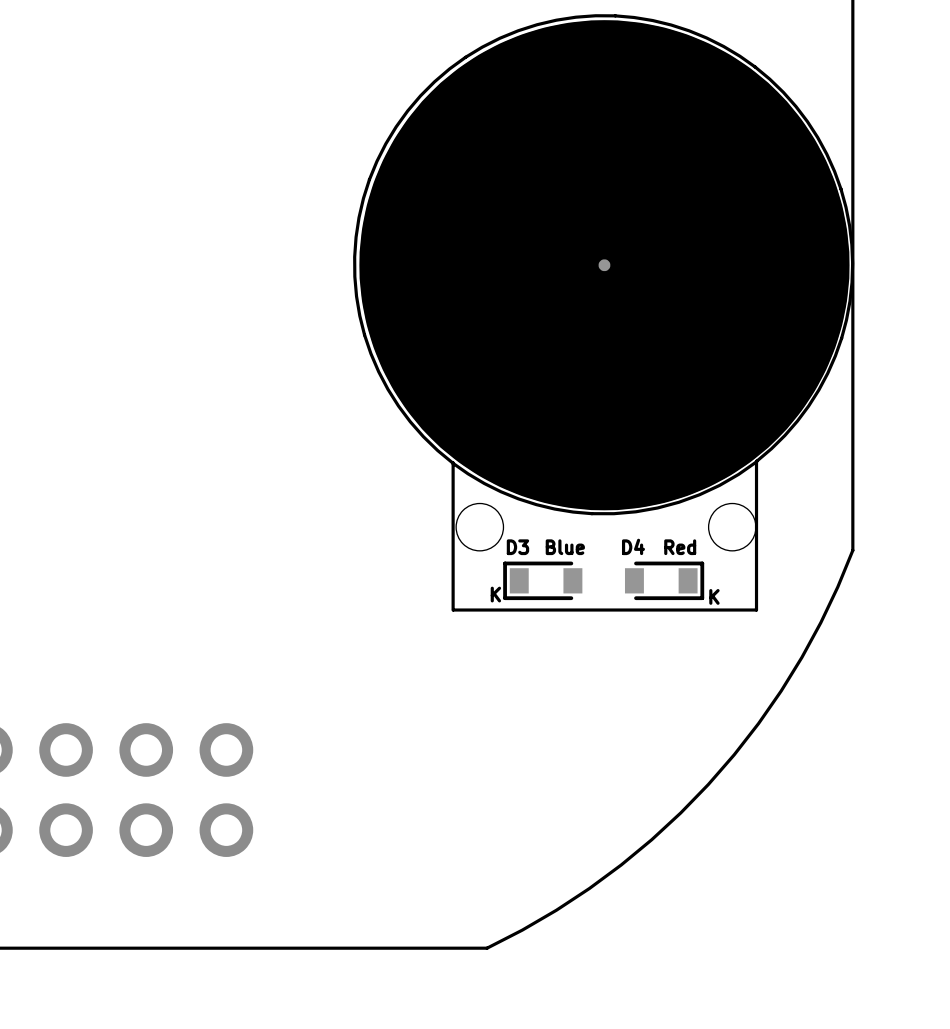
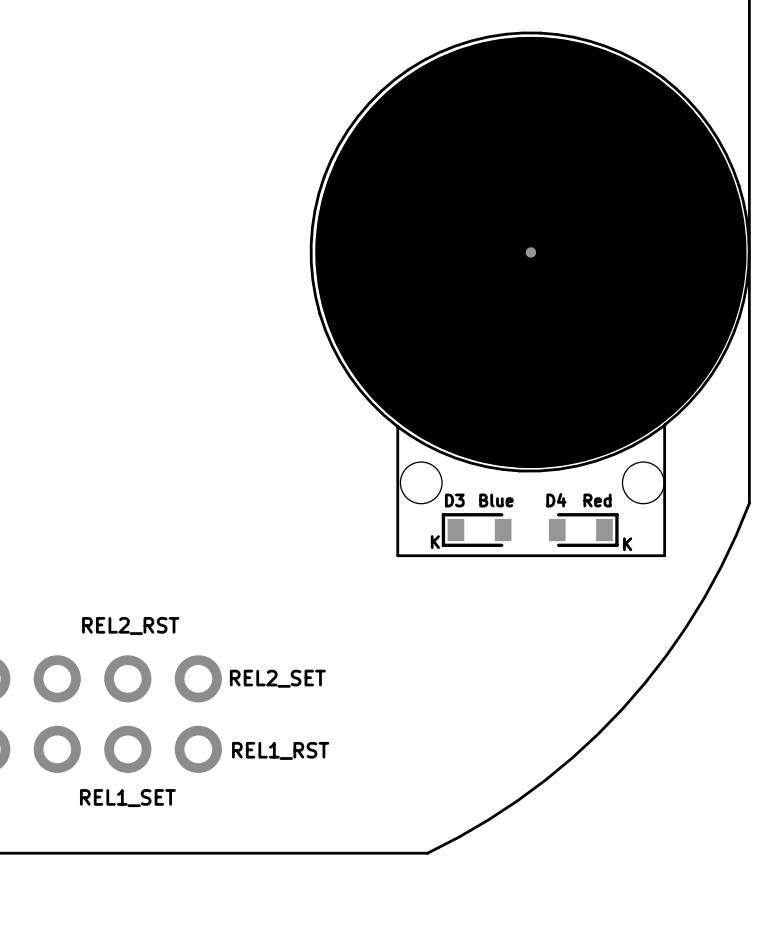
text: none -> REL2_RST (130, 625)
text: none -> REL2_SET (277, 678)
text: none -> REL1_RST (280, 750)
text: none -> REL1_SET (127, 798)

